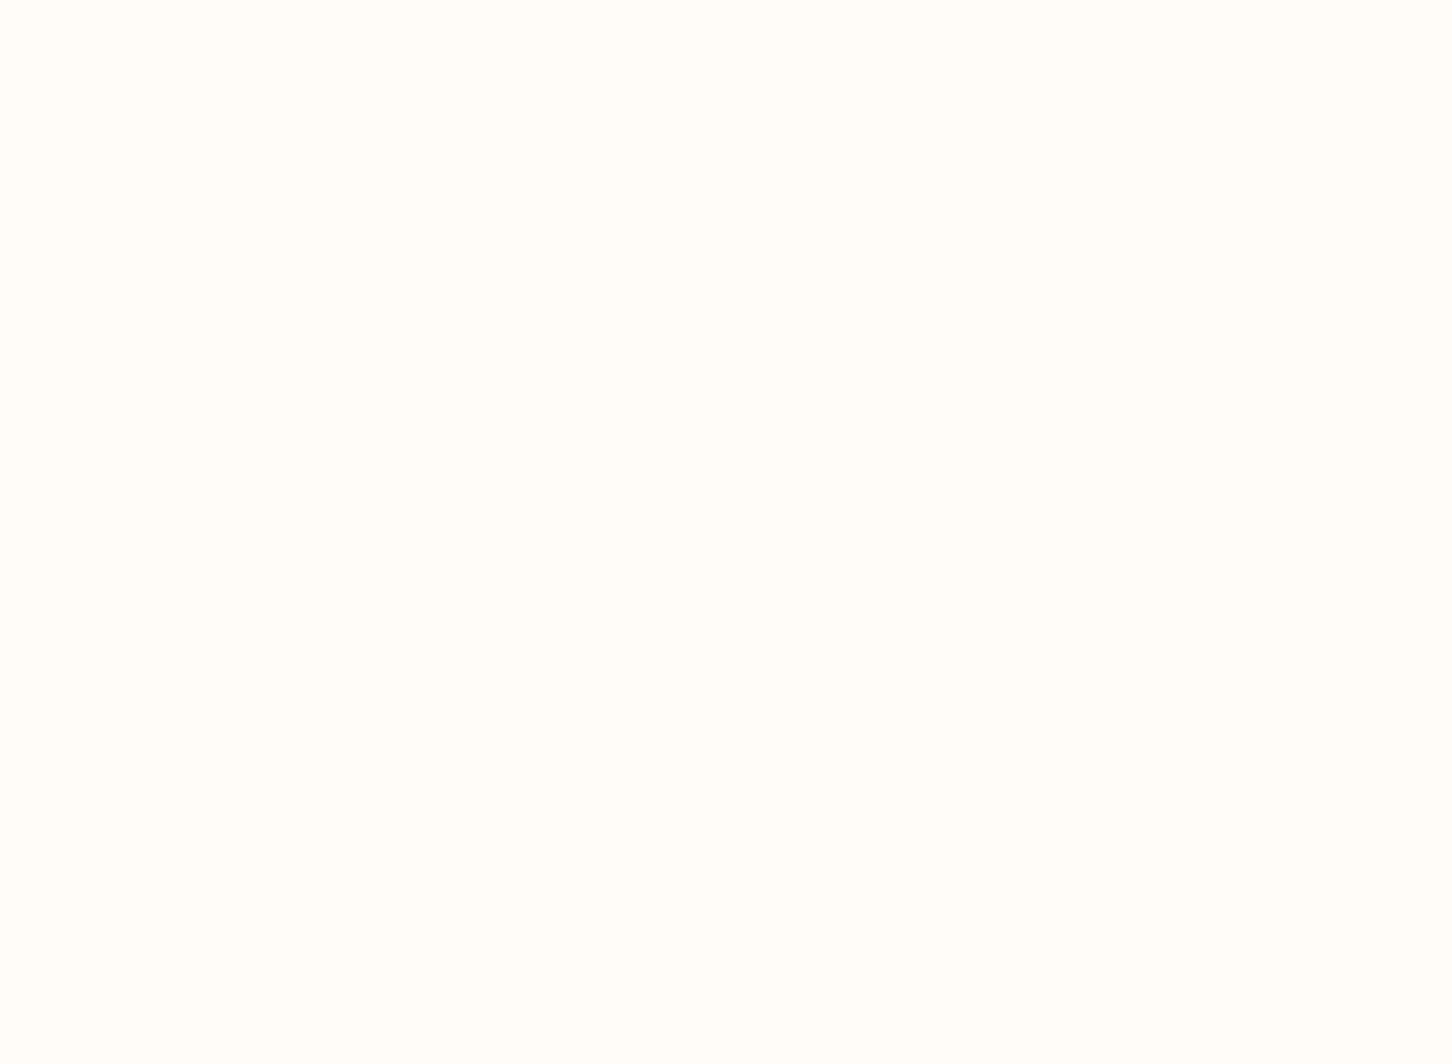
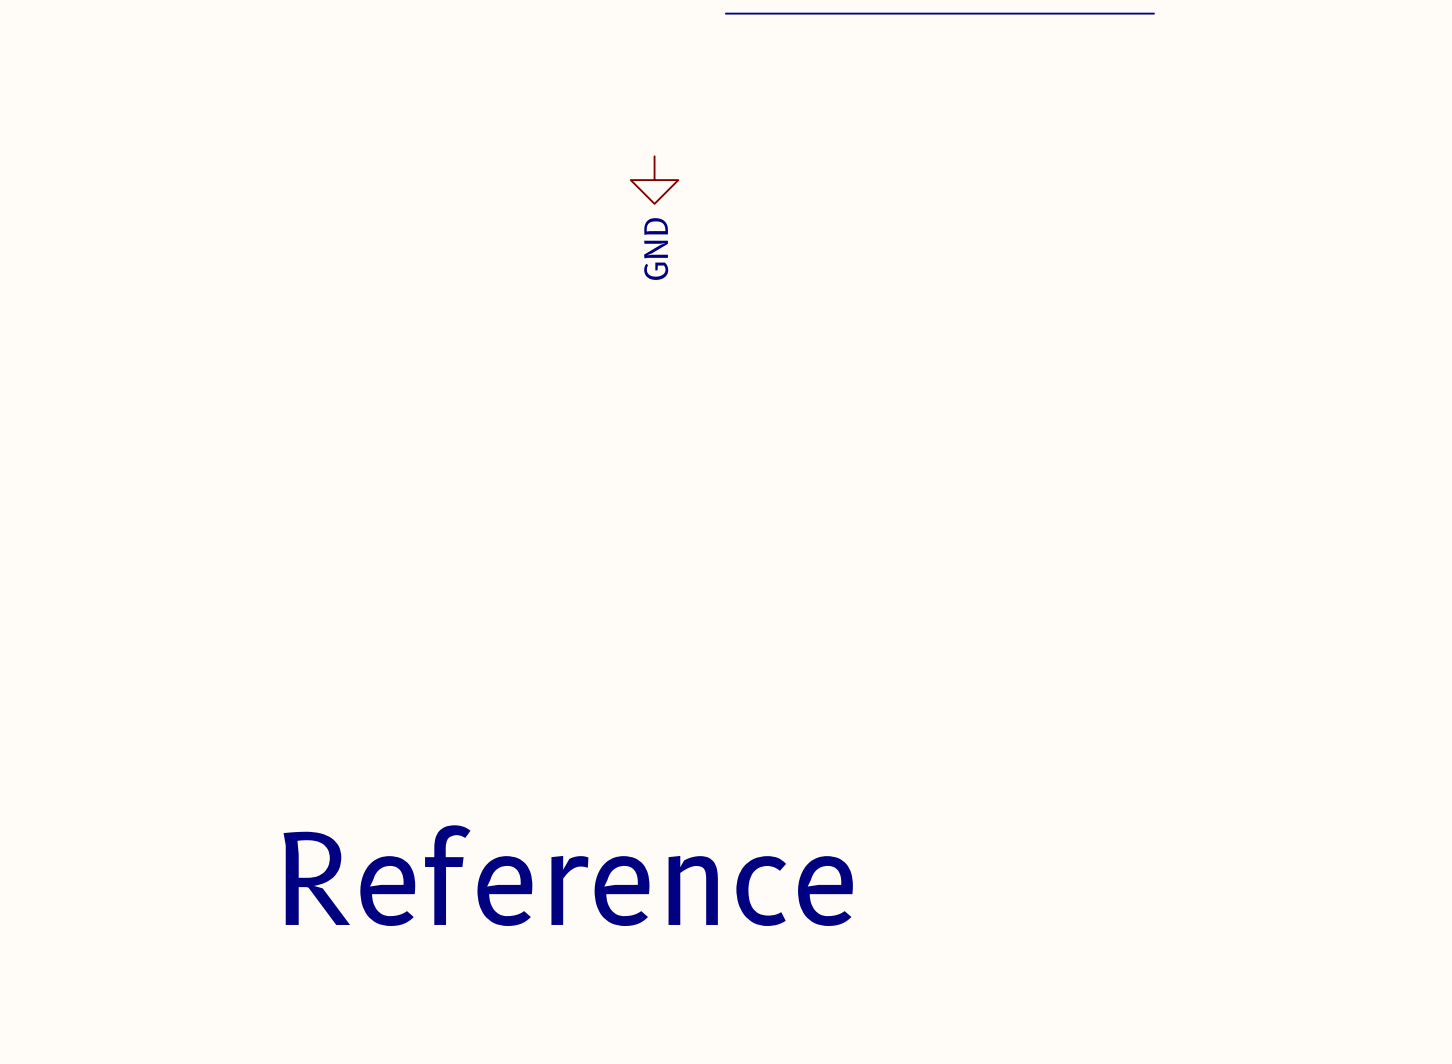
wire: none -> (725, 13) (1153, 13)
power symbol: none -> GND (654, 180)
text: none -> Reference (568, 875)

